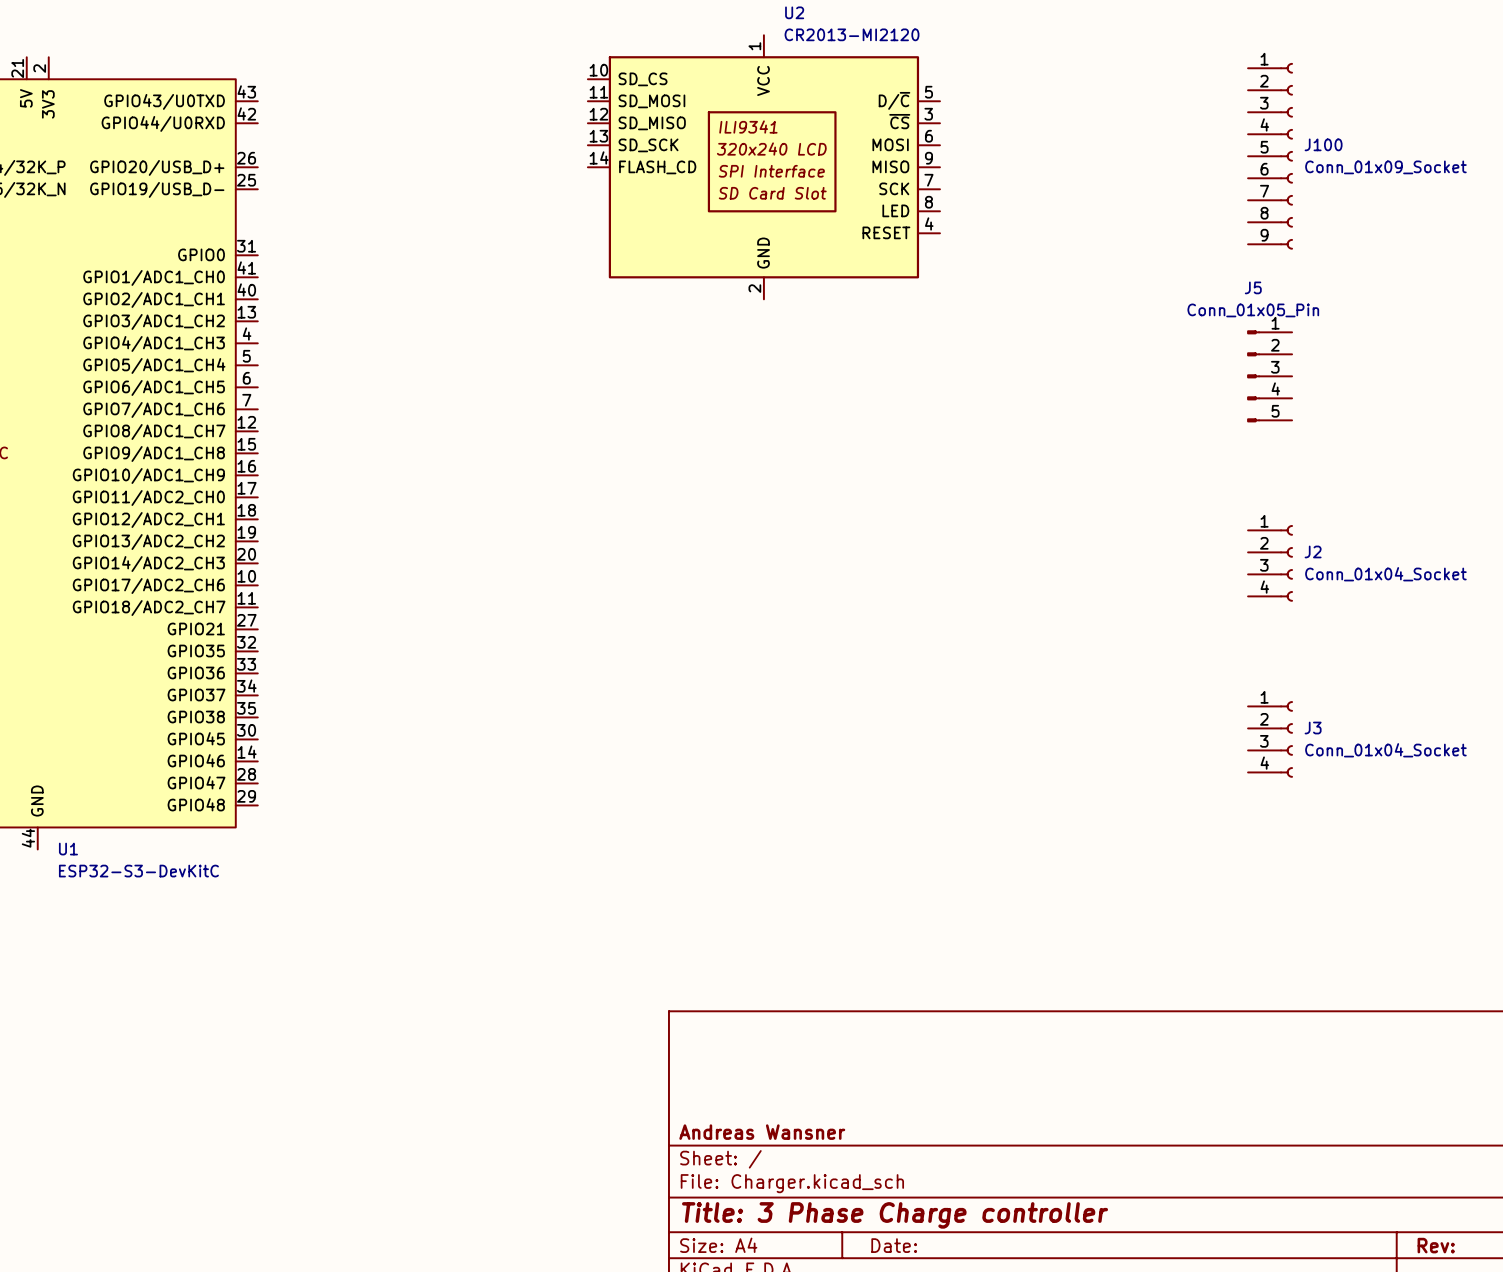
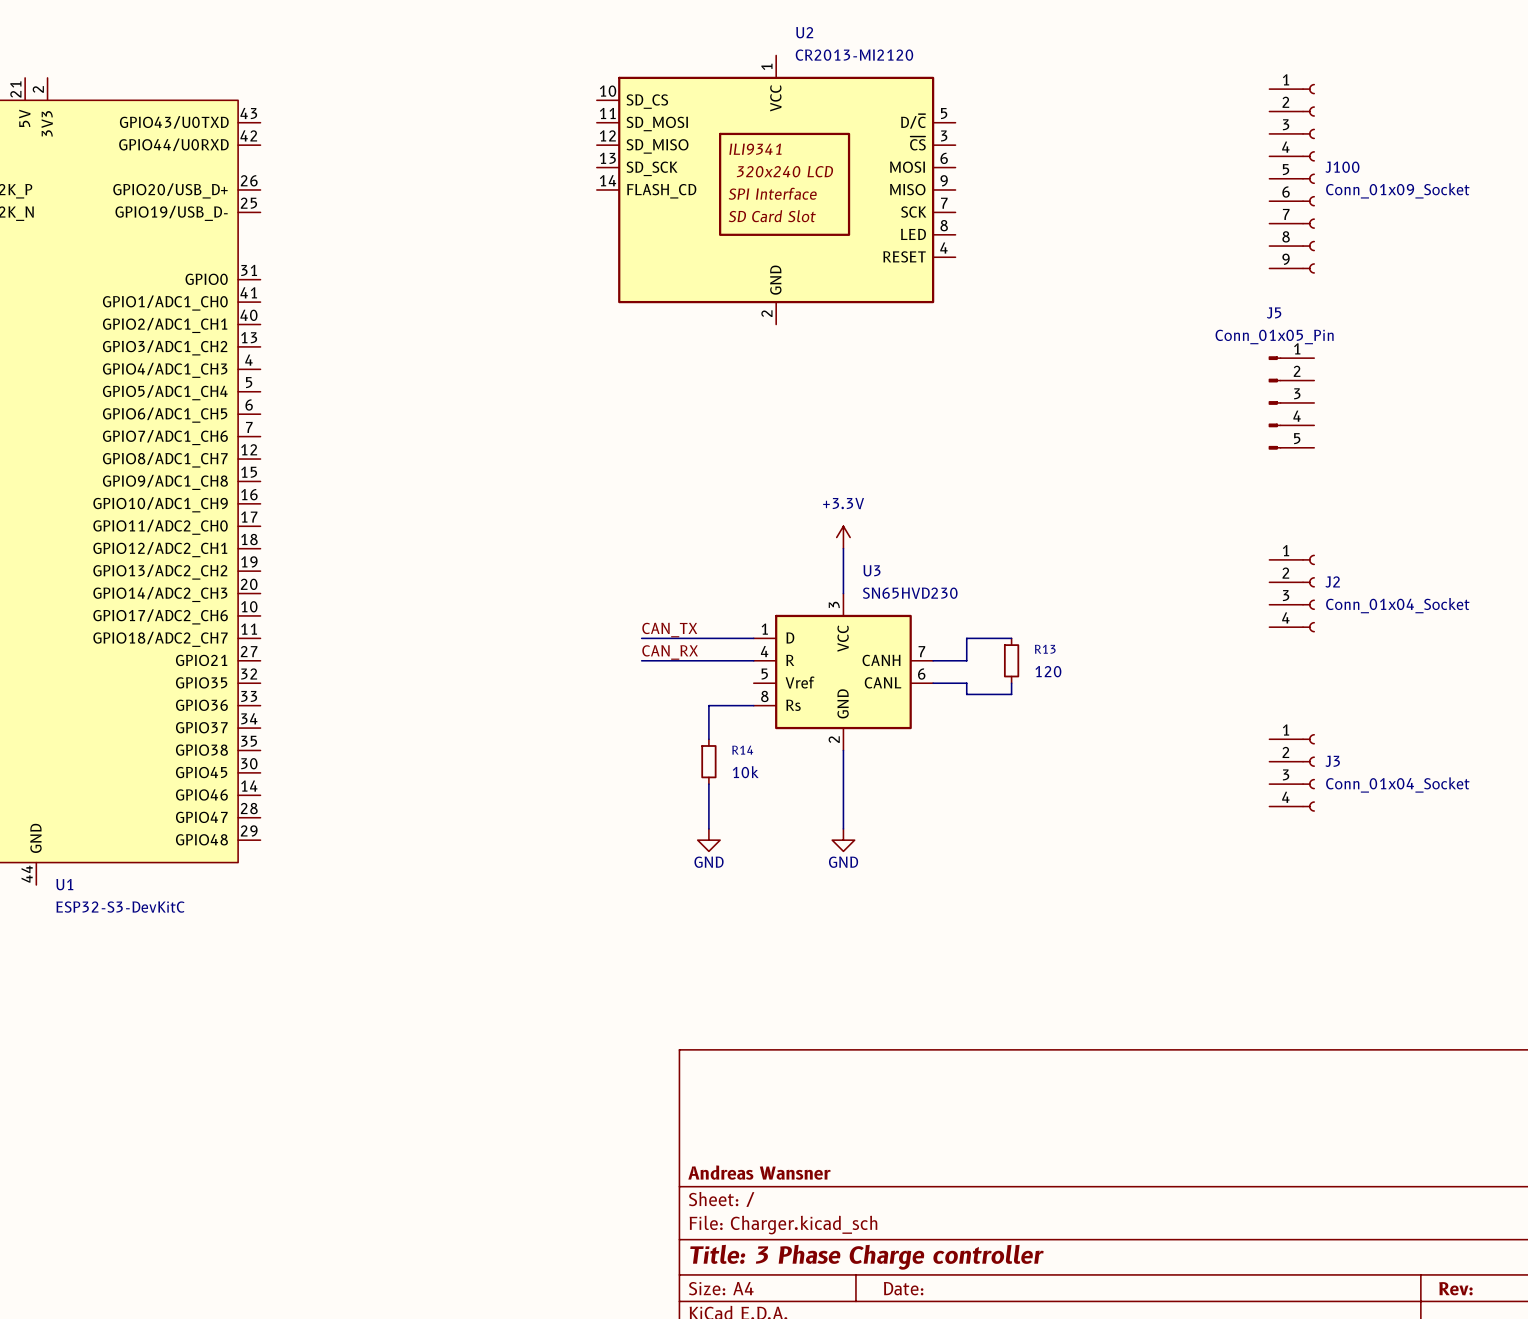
power symbol: none -> +3.3V (843, 537)
wire: none -> (843, 548) (843, 593)
label: none -> CAN_TX (669, 630)
wire: none -> (641, 638) (753, 638)
wire: none -> (1011, 638) (966, 638) (966, 660) (933, 660)
label: none -> CAN_RX (670, 652)
wire: none -> (641, 660) (753, 660)
R13: none -> 120 (1011, 660)
U3: none -> SN65HVD230 (843, 672)
wire: none -> (933, 683) (966, 683) (966, 694) (1011, 694) (1011, 683)
wire: none -> (753, 705) (708, 705) (708, 739)
wire: none -> (843, 750) (843, 828)
R14: none -> 10k (708, 761)
wire: none -> (708, 784) (708, 828)
power symbol: none -> GND (708, 840)
power symbol: none -> GND (843, 840)

